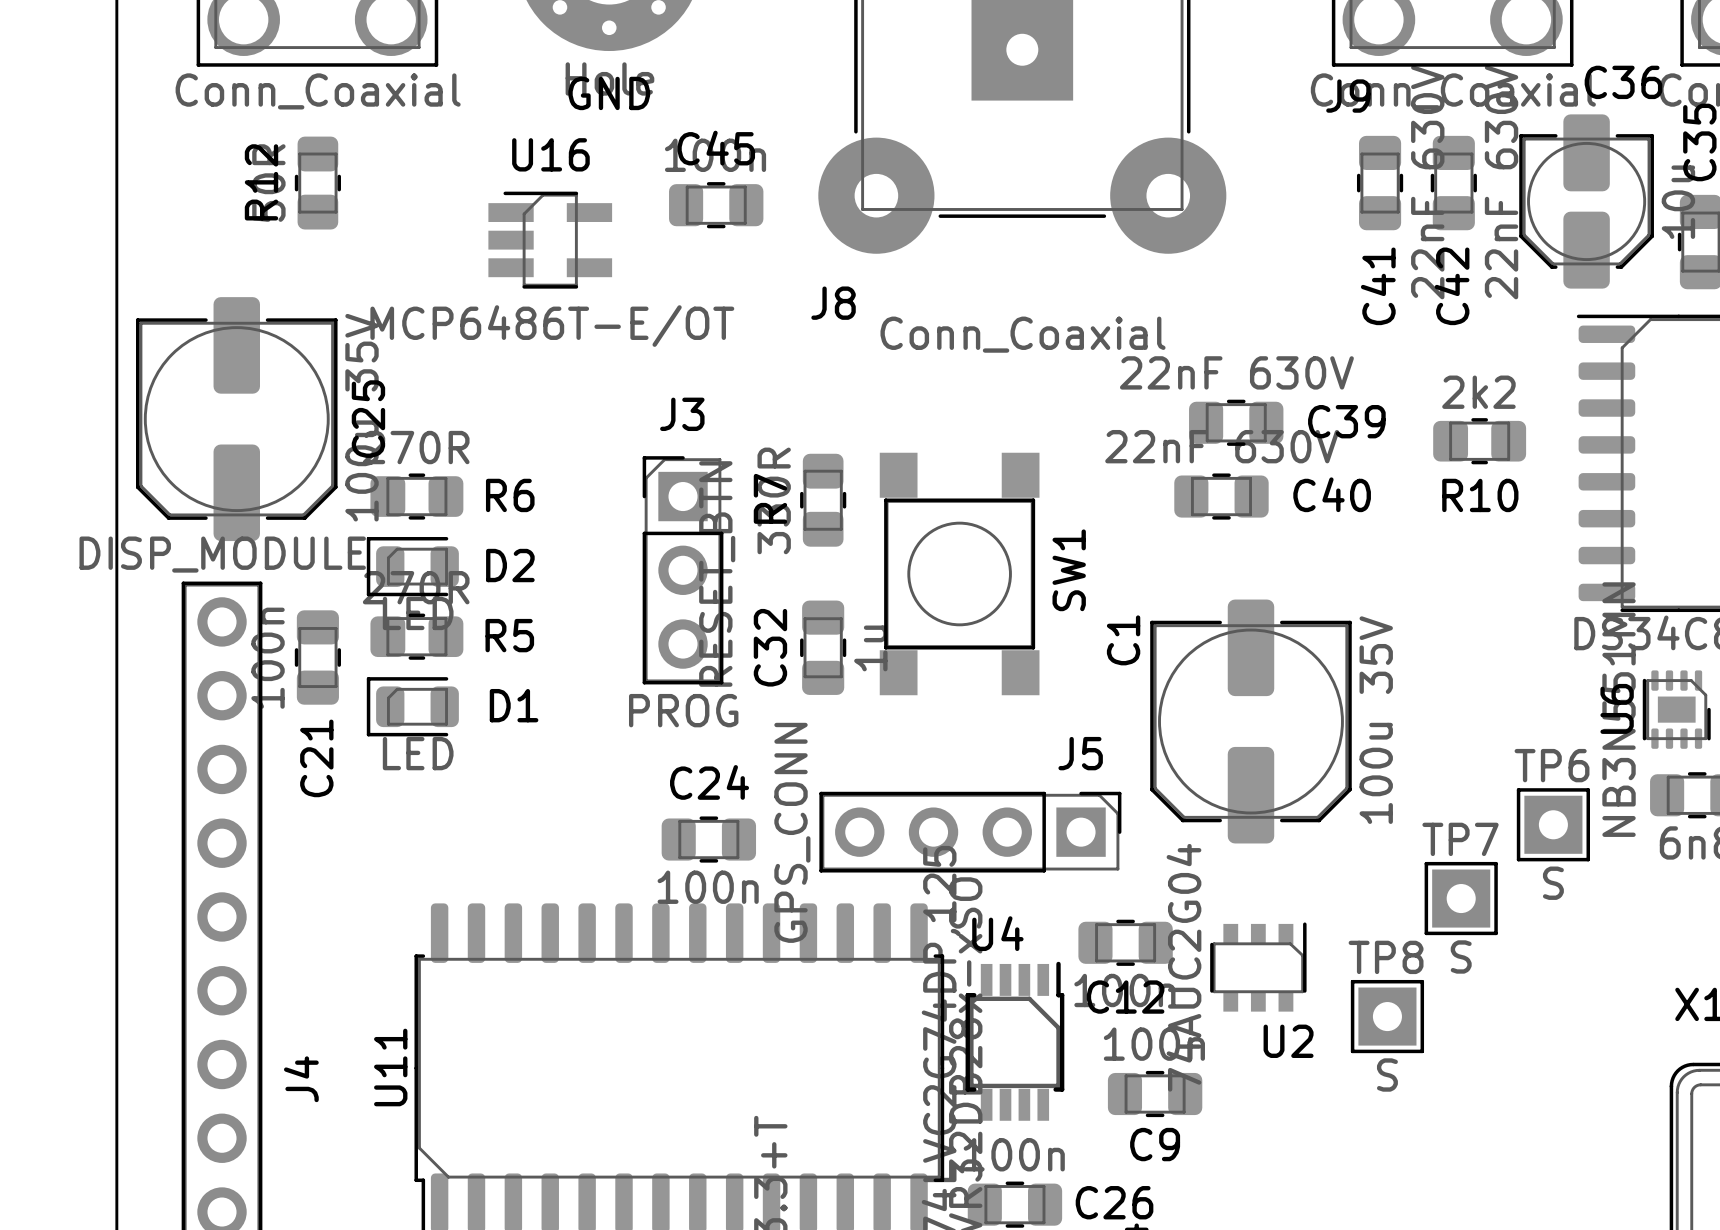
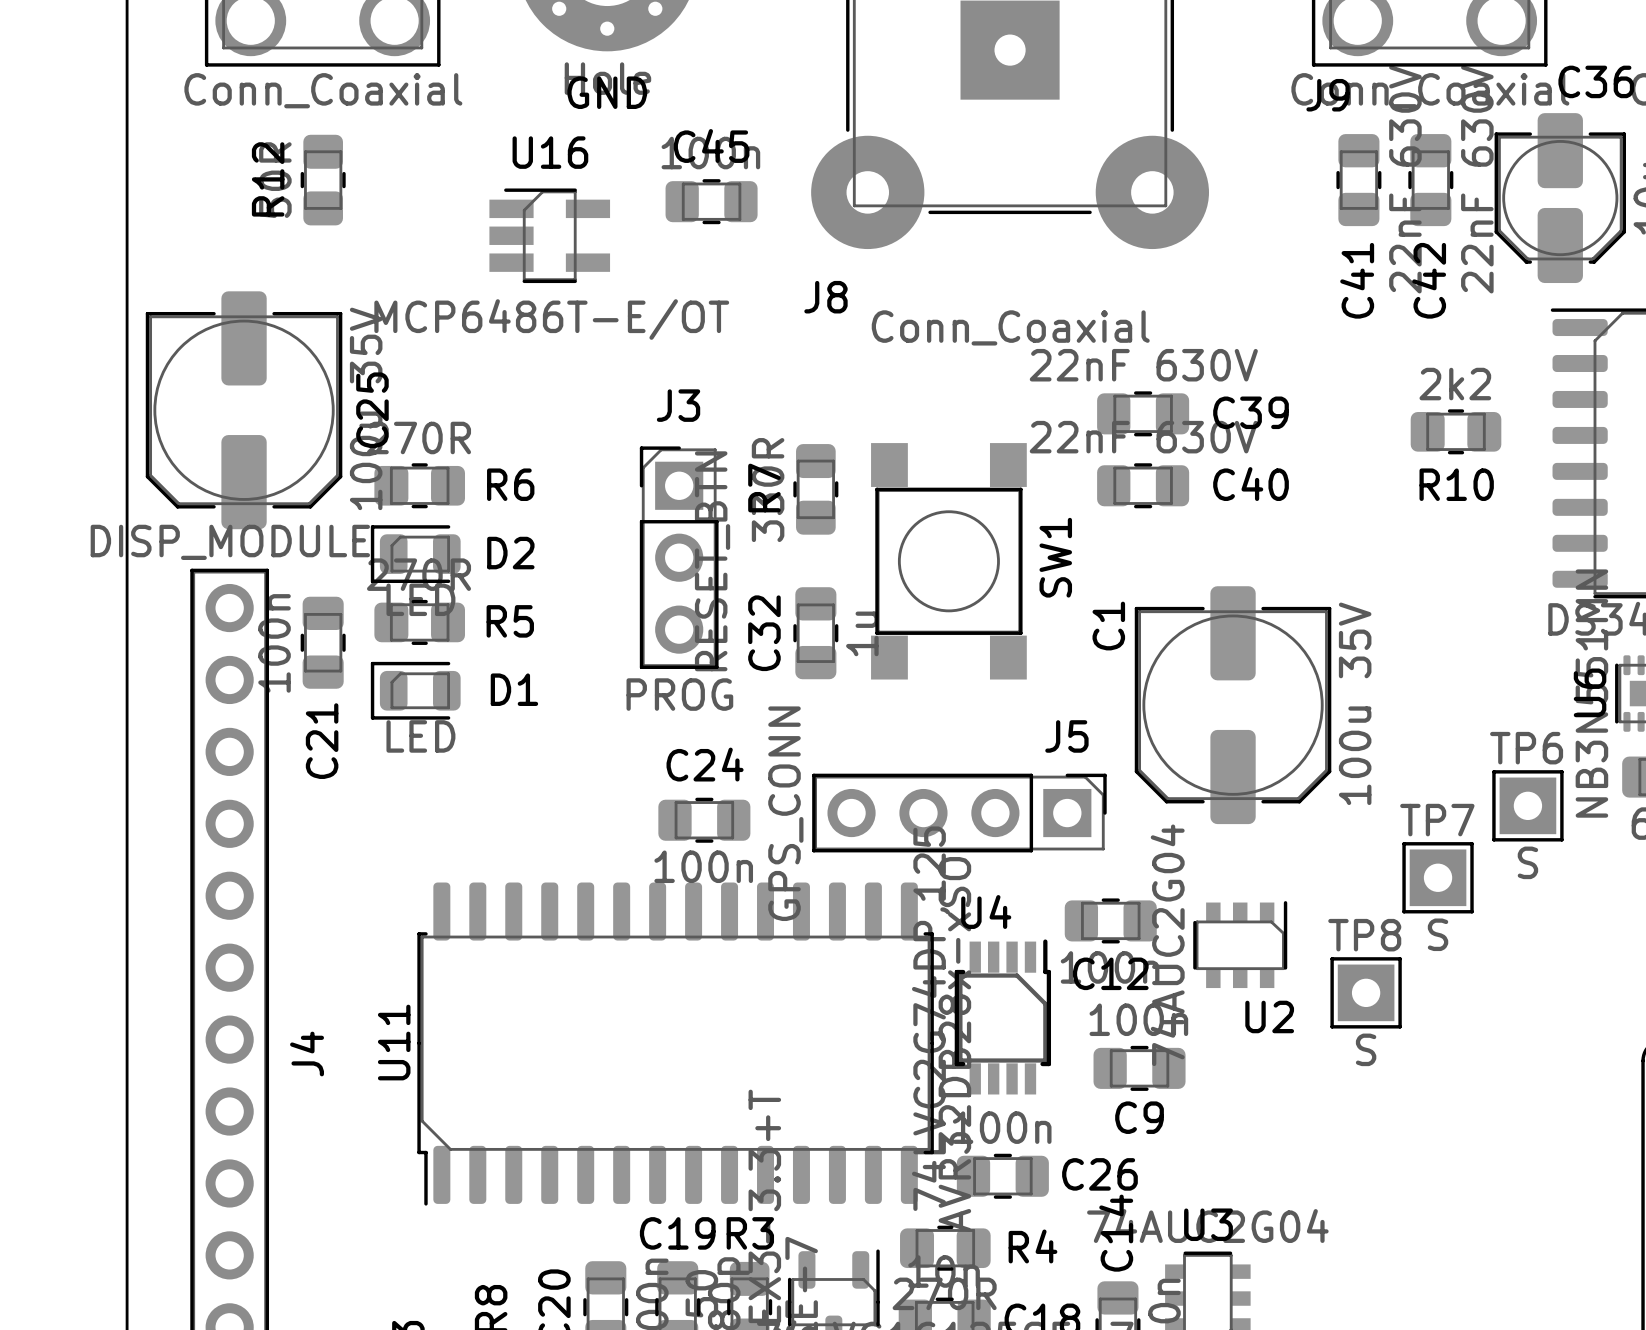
C39 position: (1236, 422) -> (1143, 413)
C40 position: (1221, 496) -> (1143, 485)

